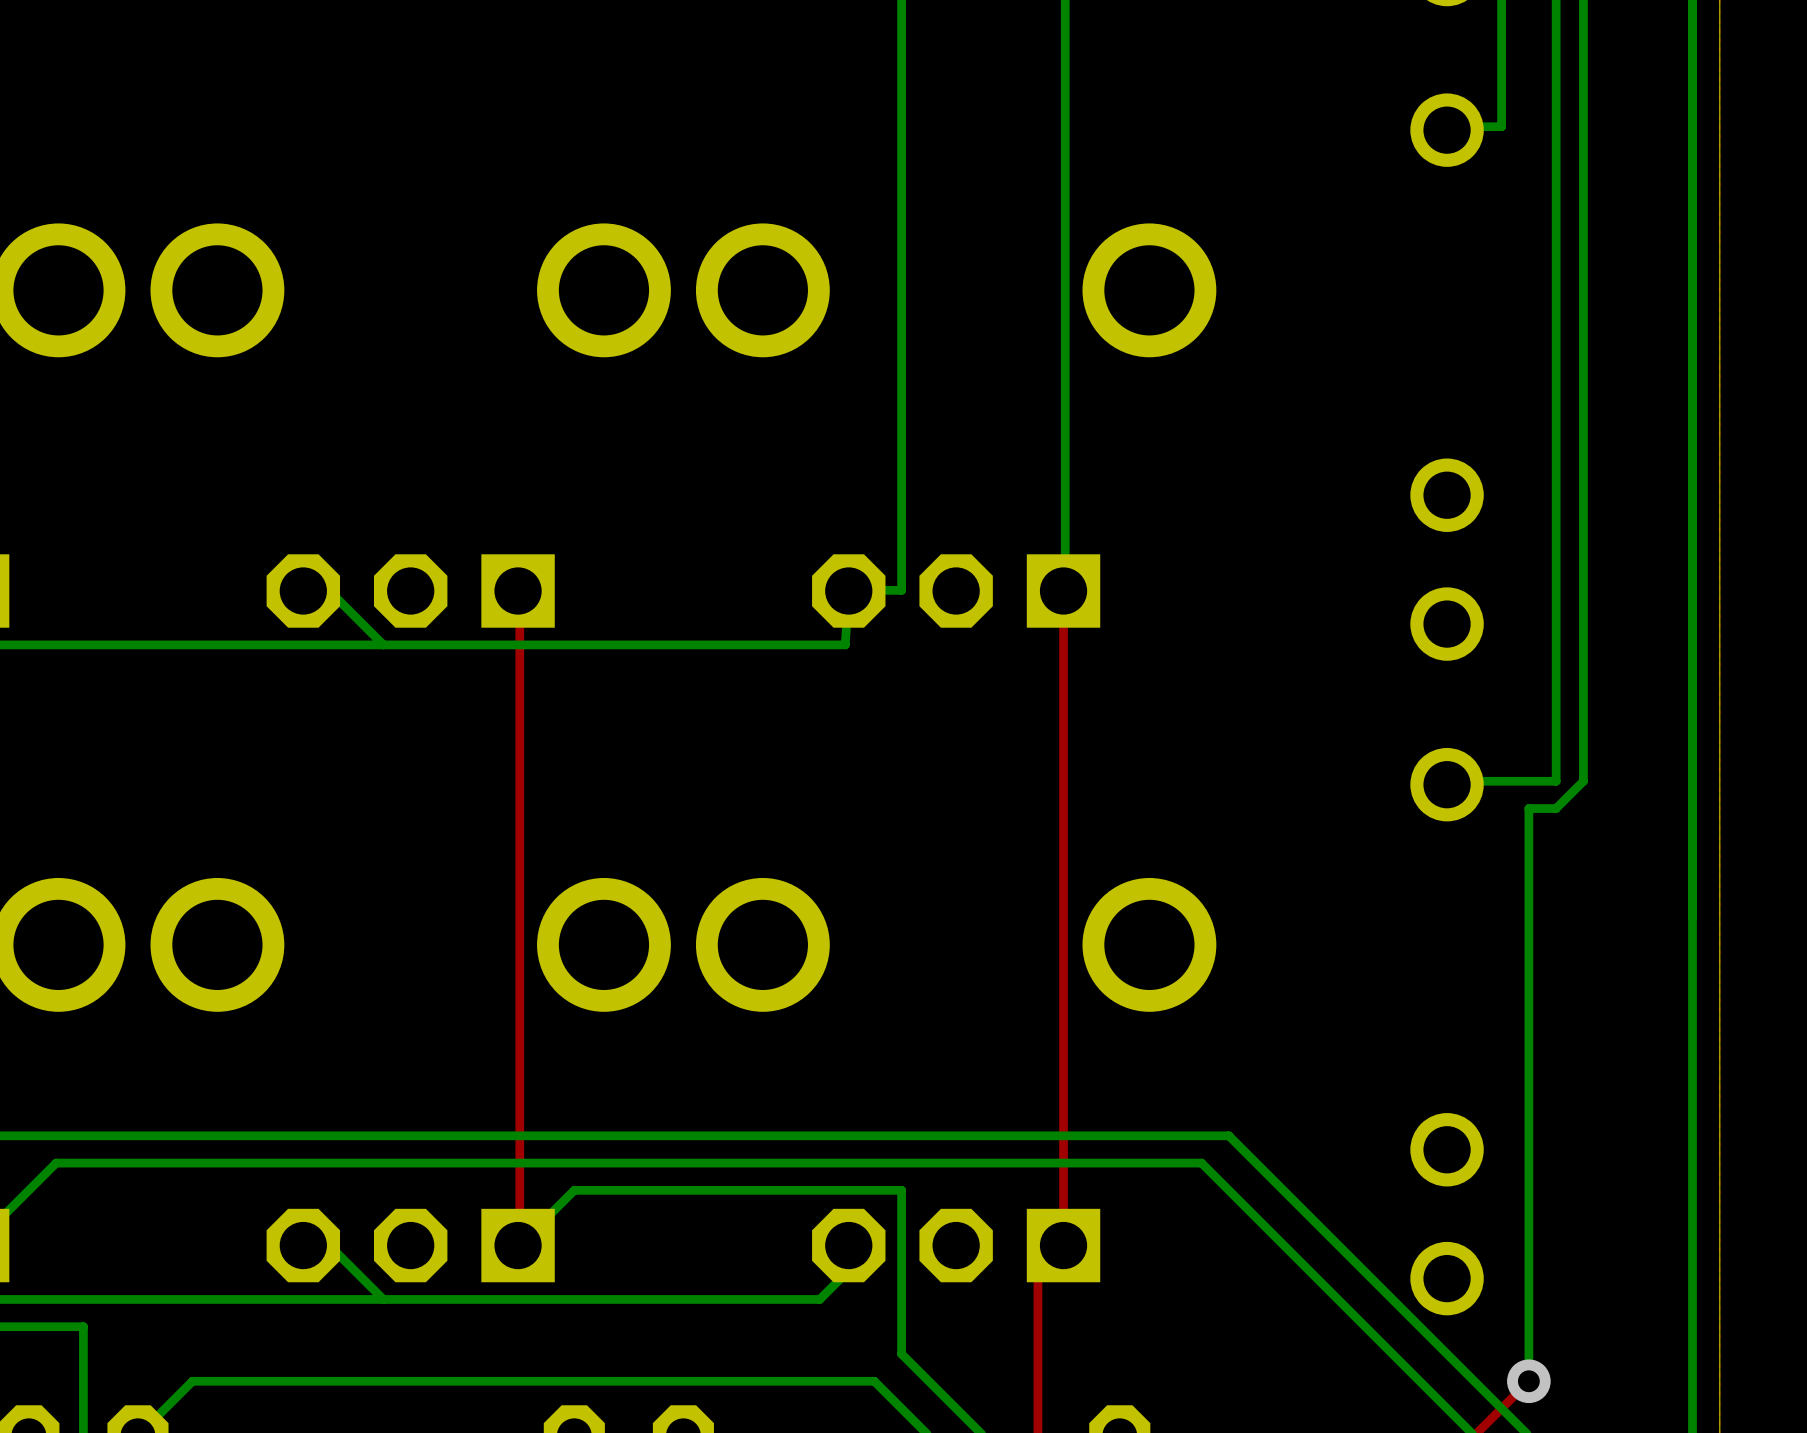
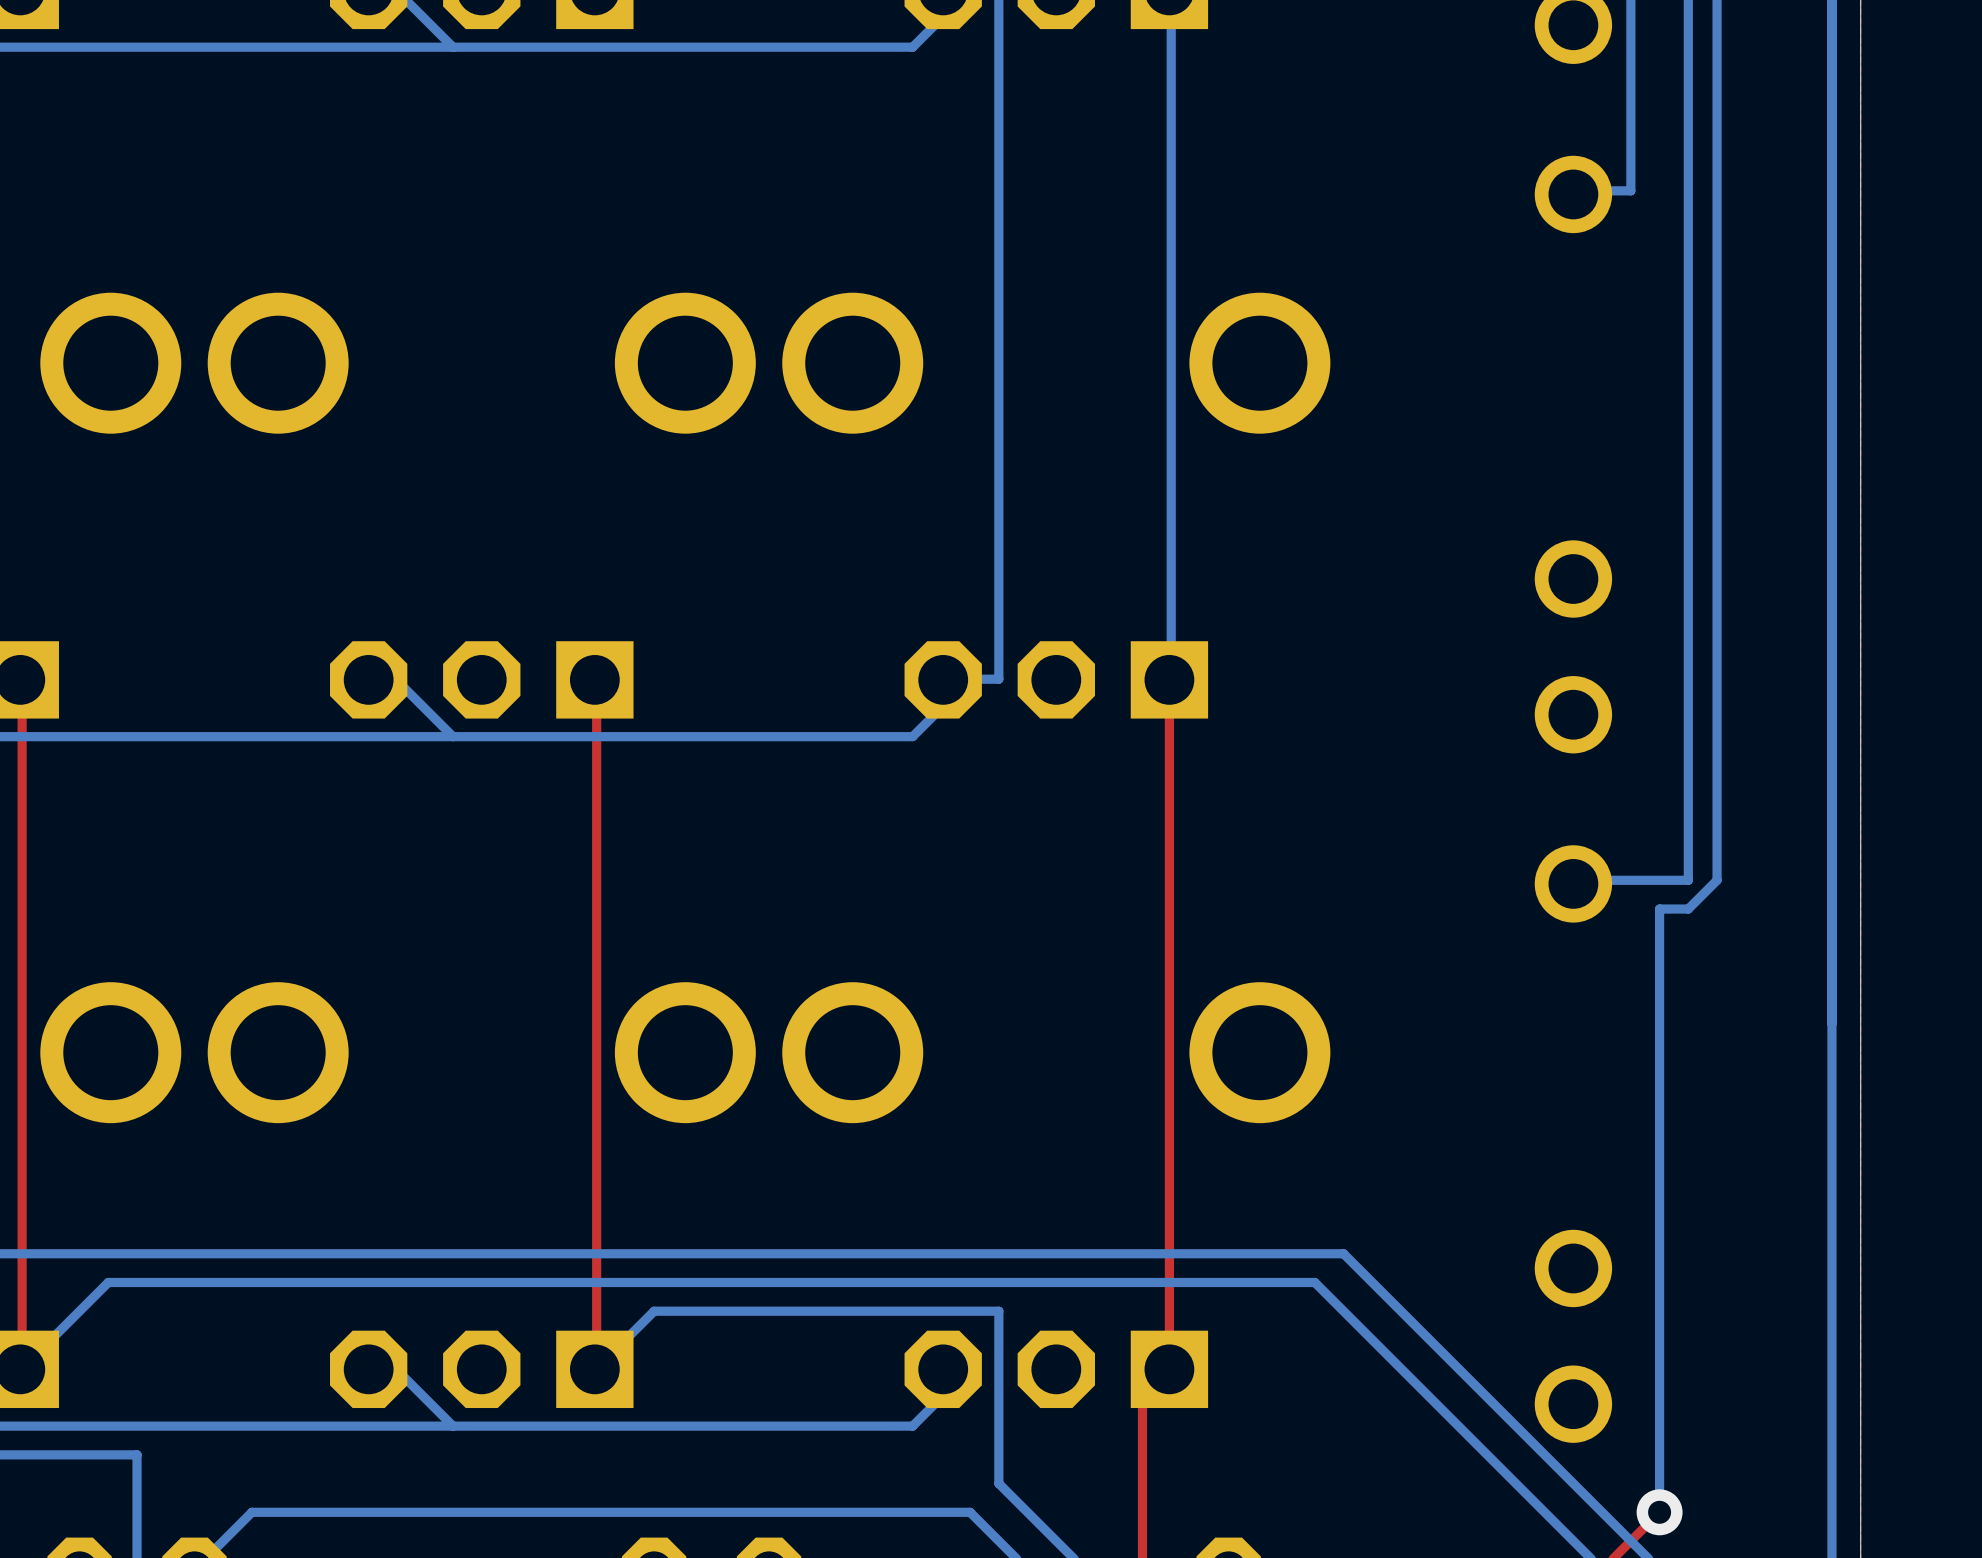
bottom track: (847, 617) (845, 644) (819, 644) -> (941, 707) (912, 736)

